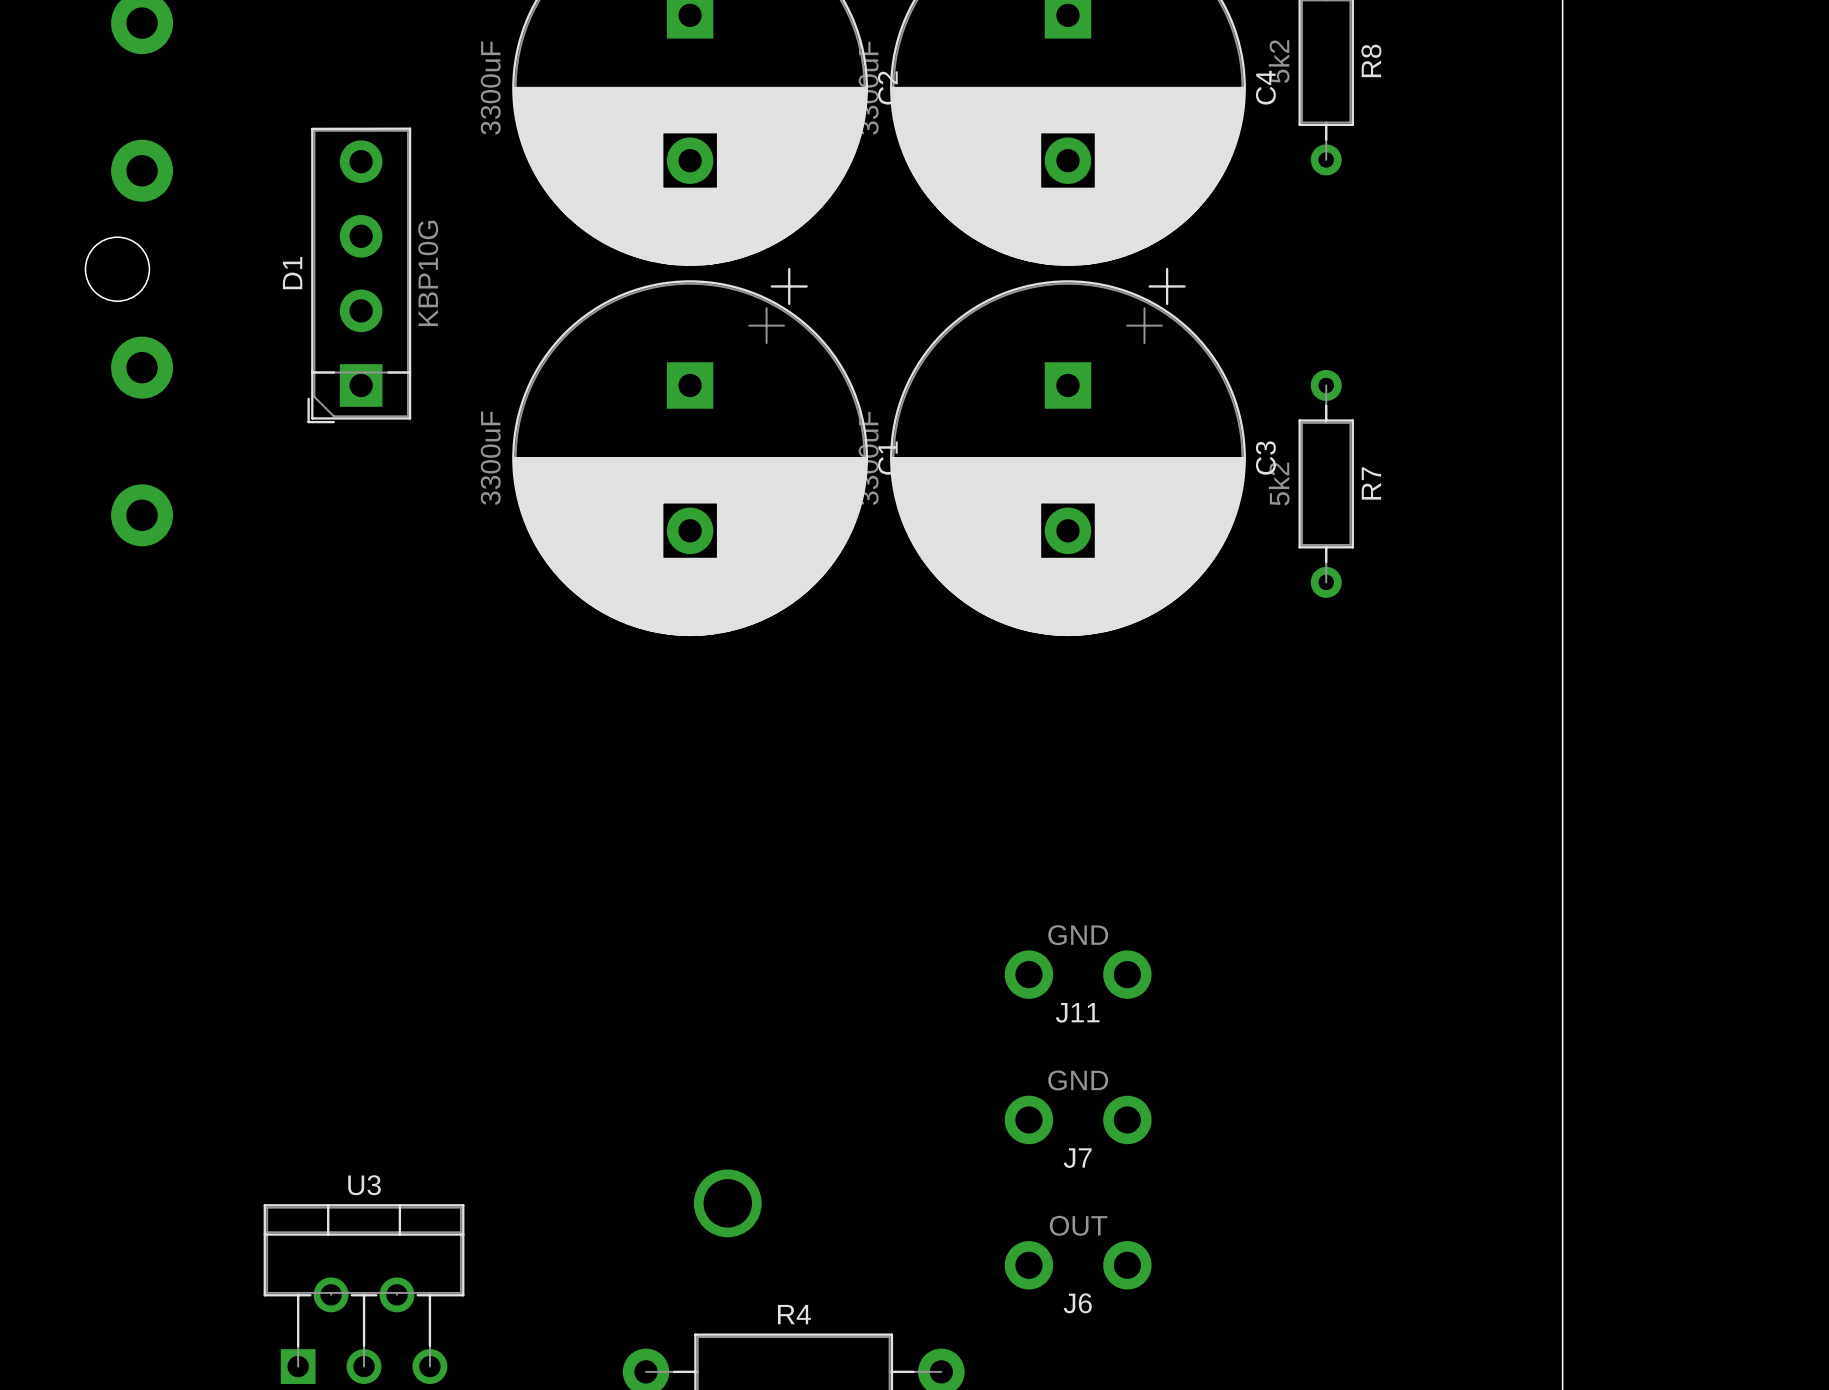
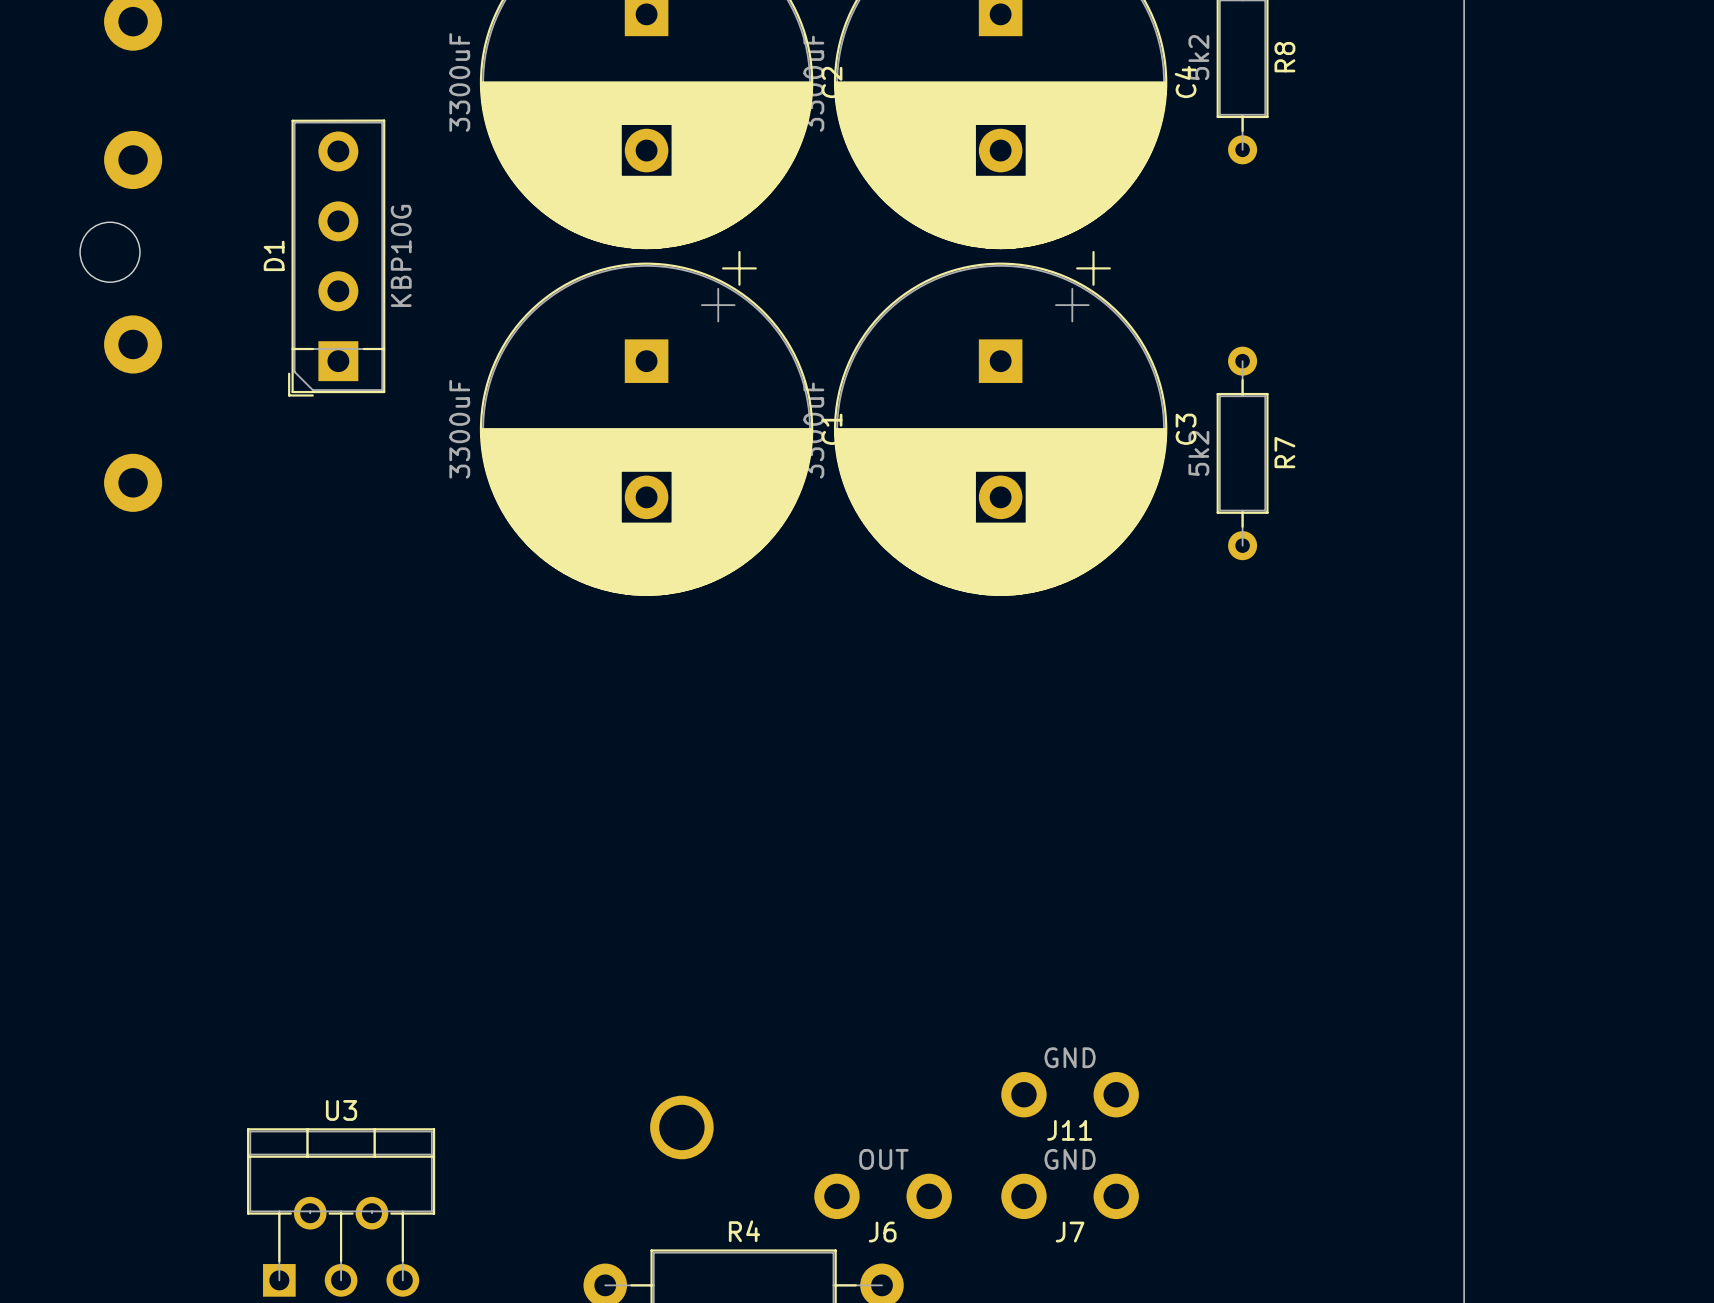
J11 position: (1078, 974) -> (1070, 1094)
J7 position: (1078, 1119) -> (1070, 1196)
J6 position: (1078, 1265) -> (883, 1196)

